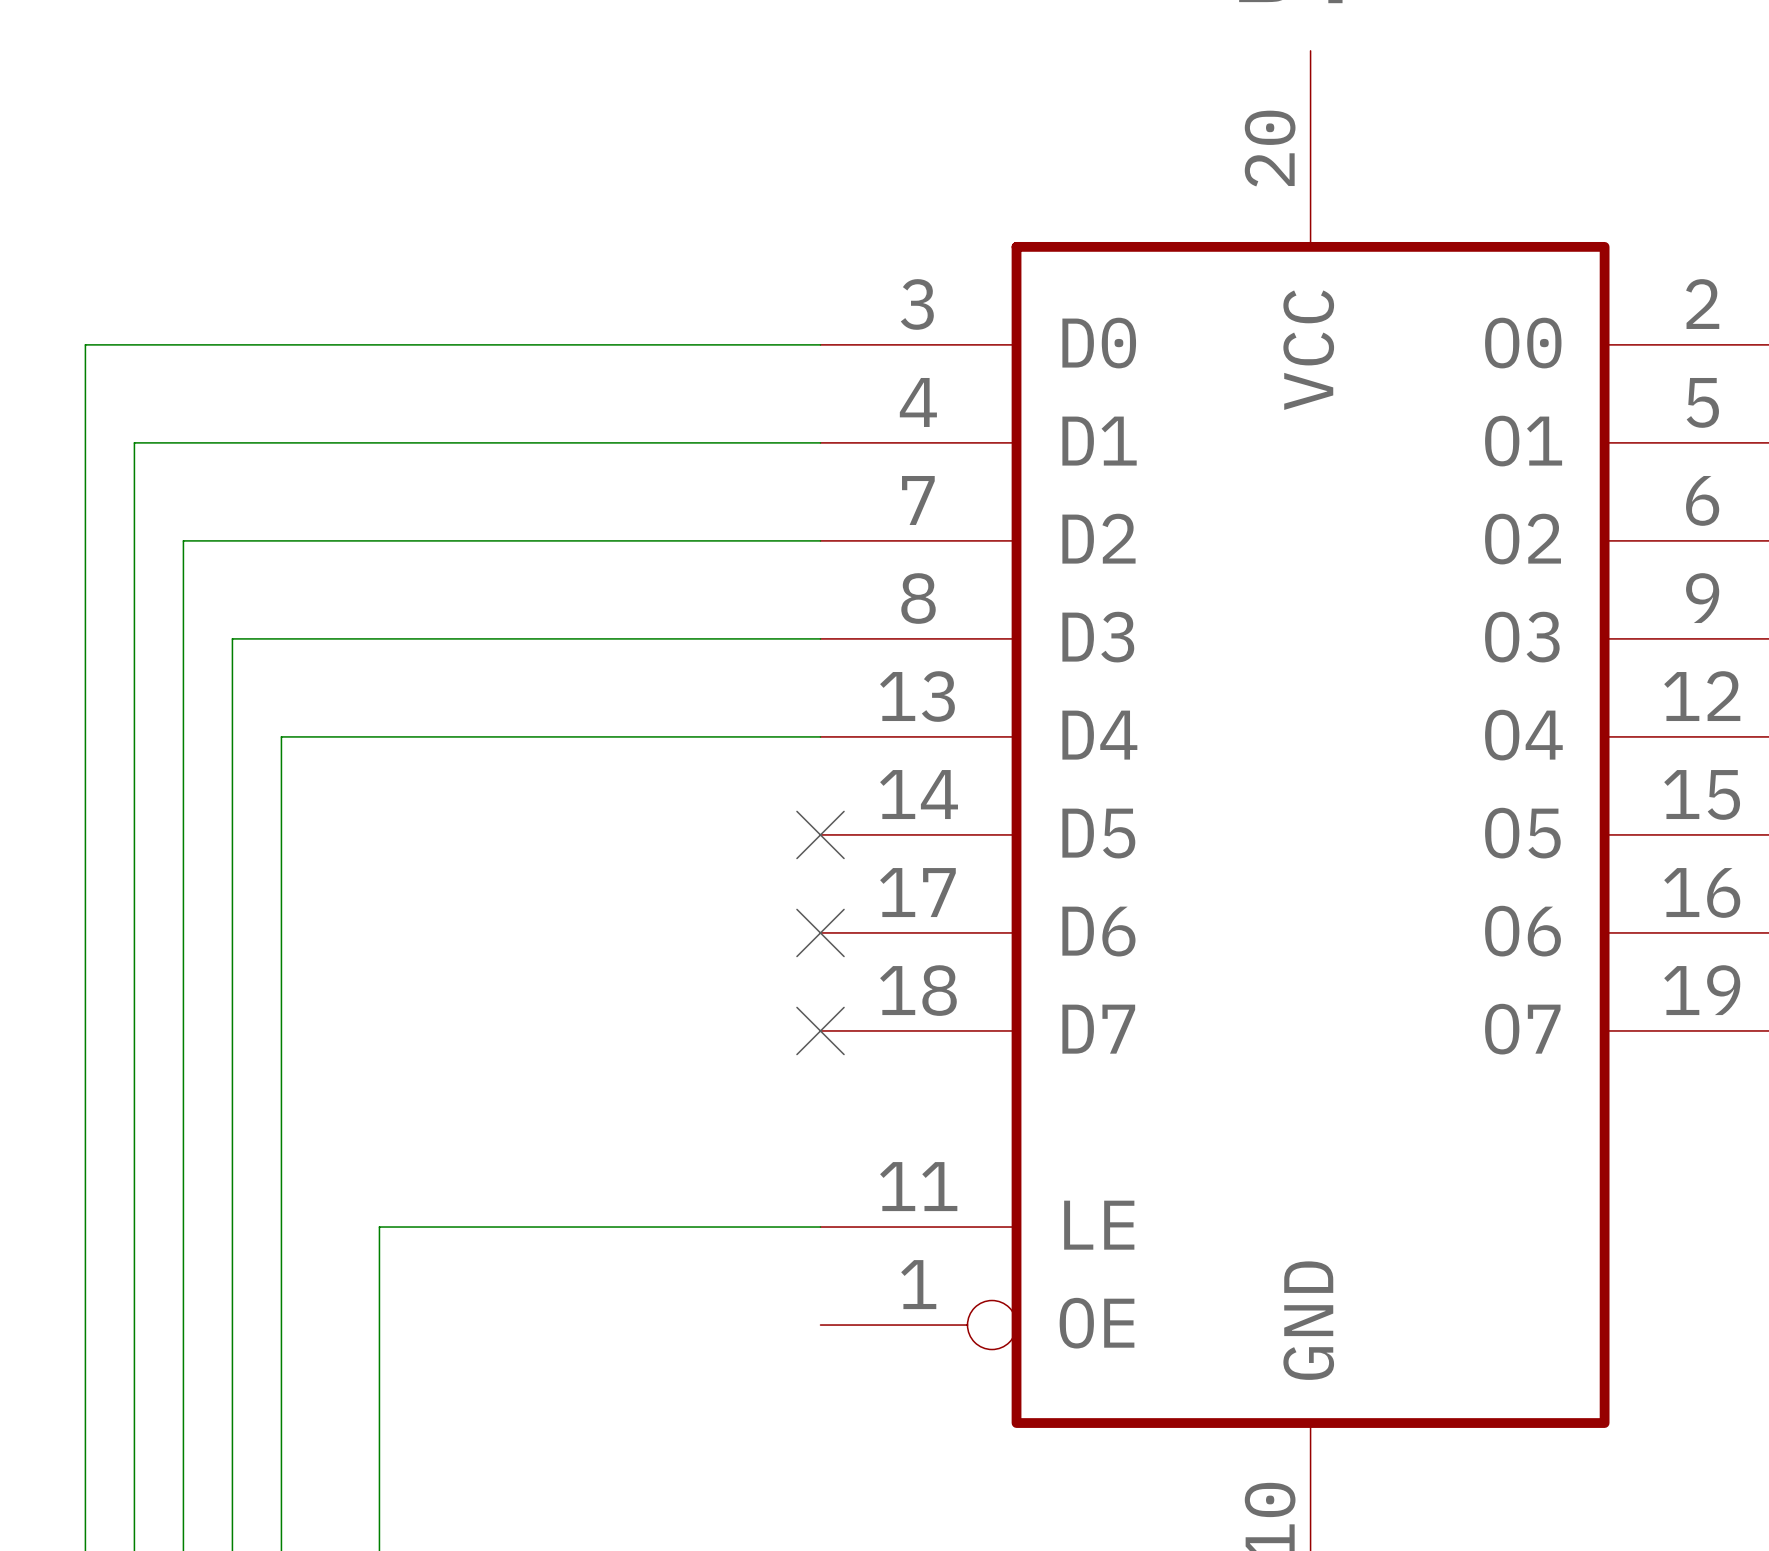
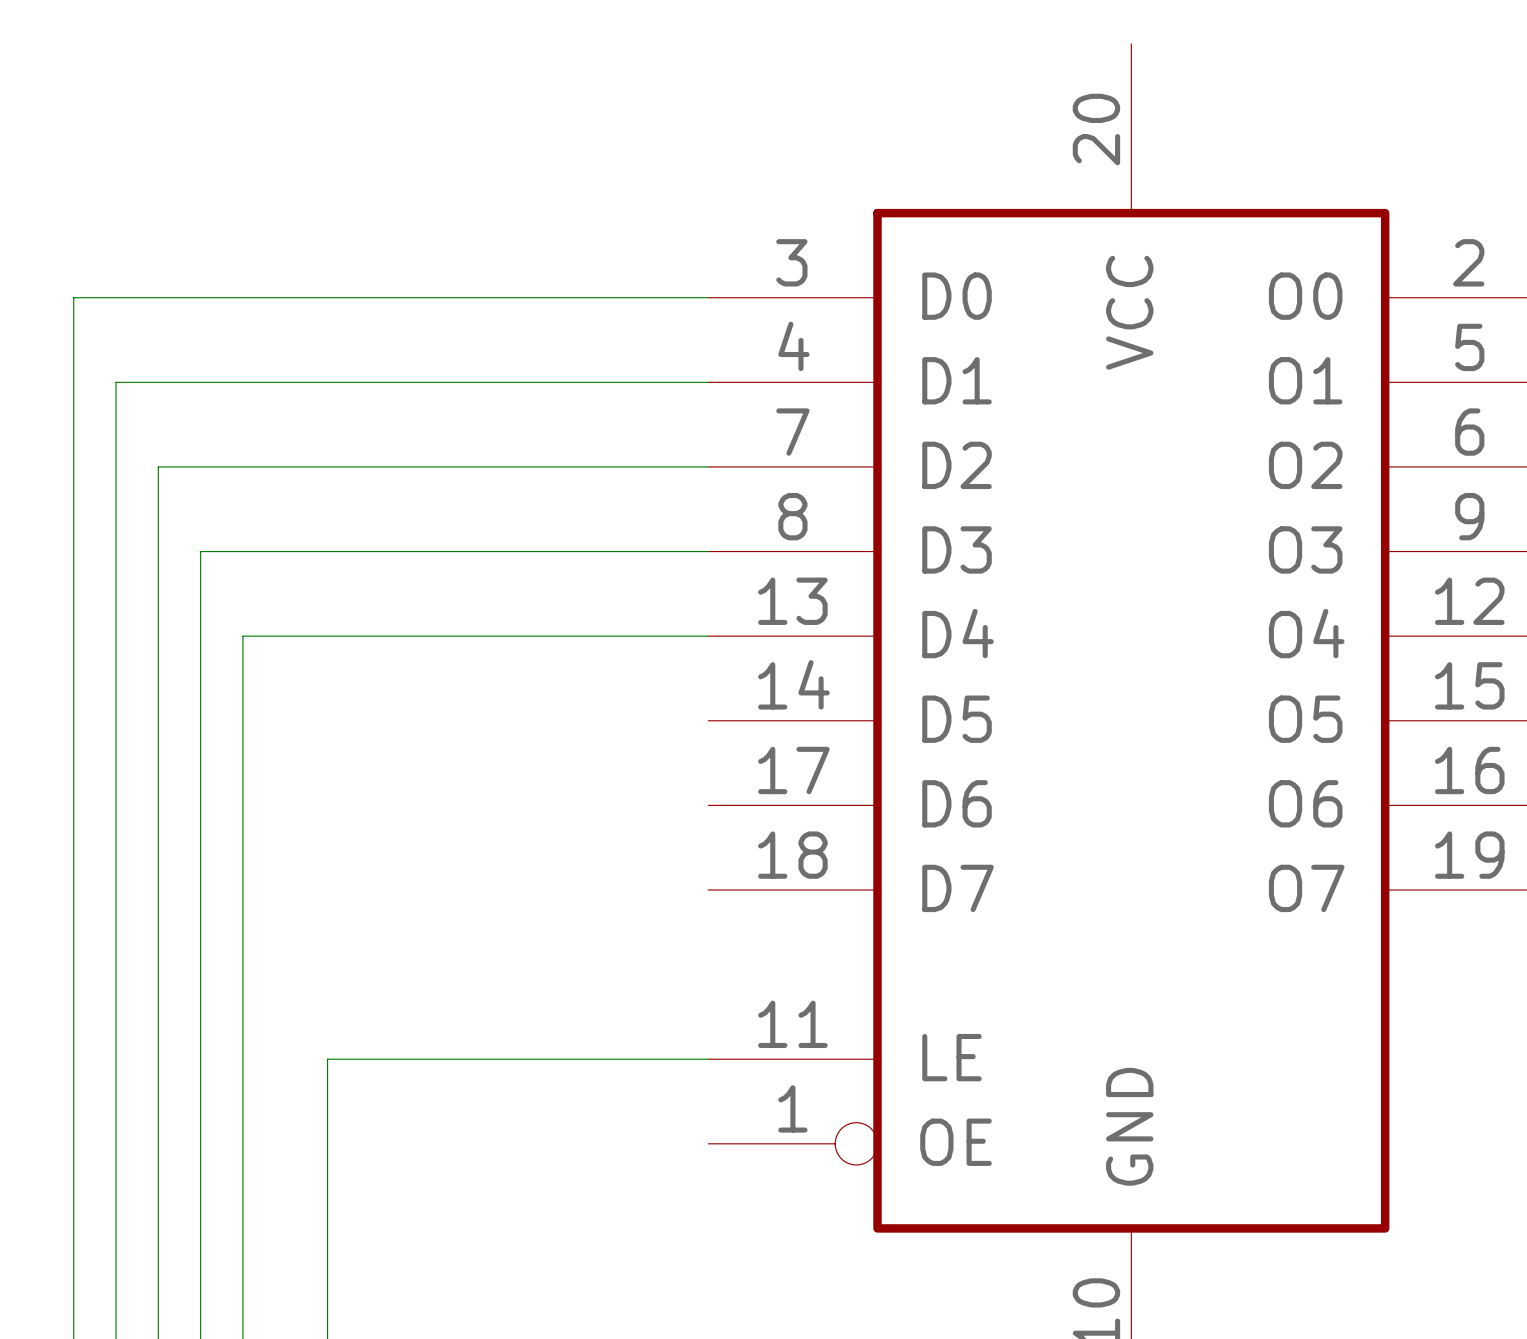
no-connect mark: (820, 834) -> none
no-connect mark: (820, 932) -> none
no-connect mark: (820, 1030) -> none

